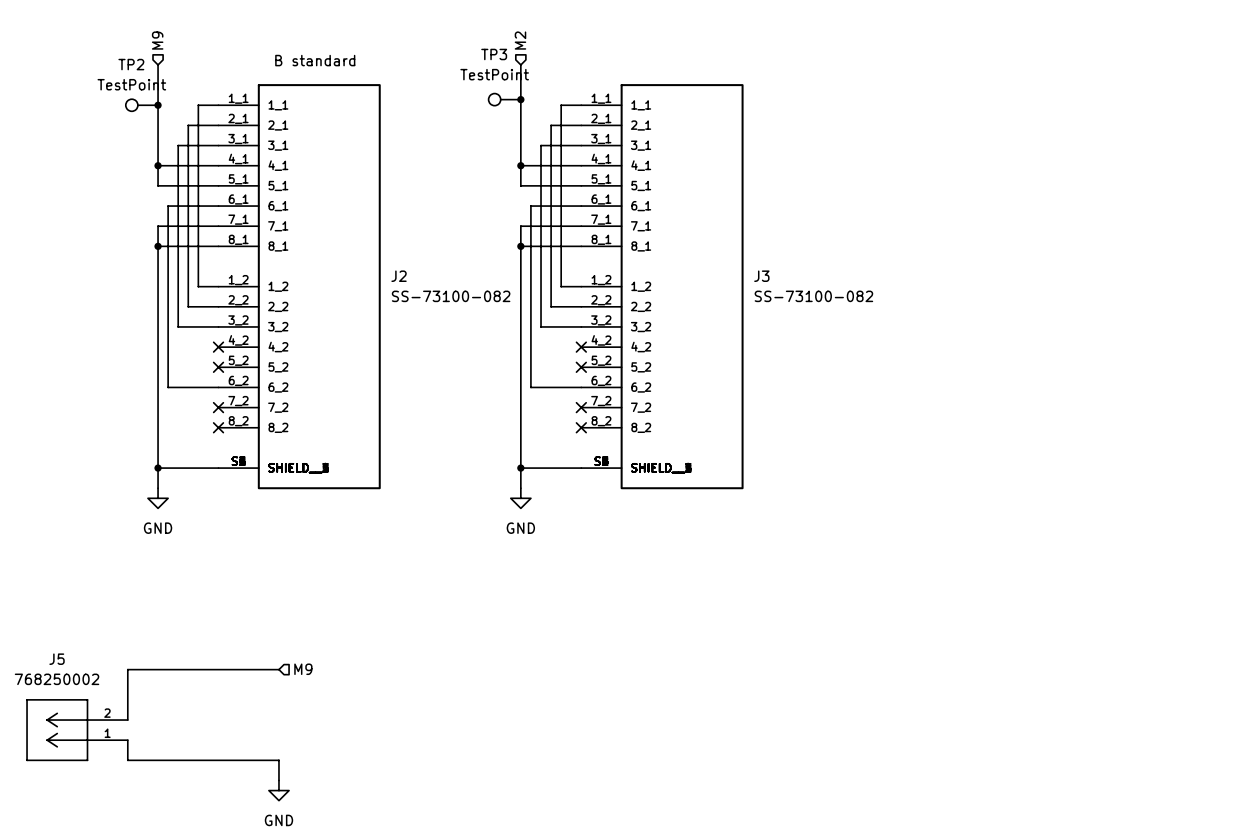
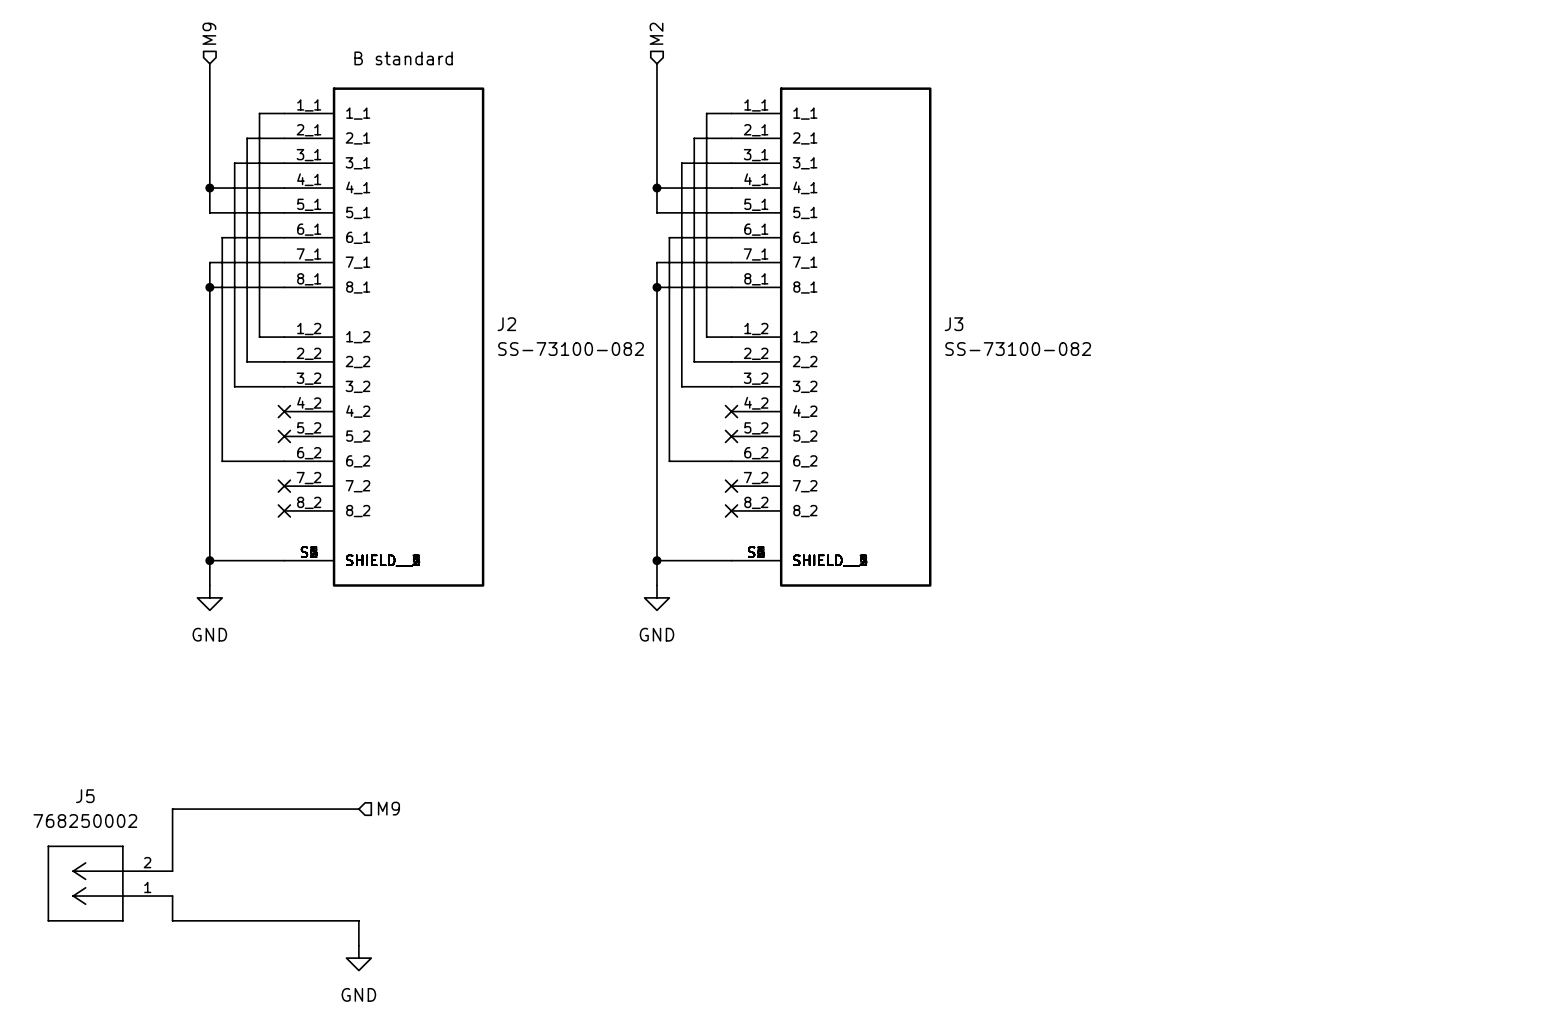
TP3: TestPoint (504, 99) -> none
junction: (520, 99) -> none
TP2: TestPoint (141, 105) -> none
junction: (158, 105) -> none

